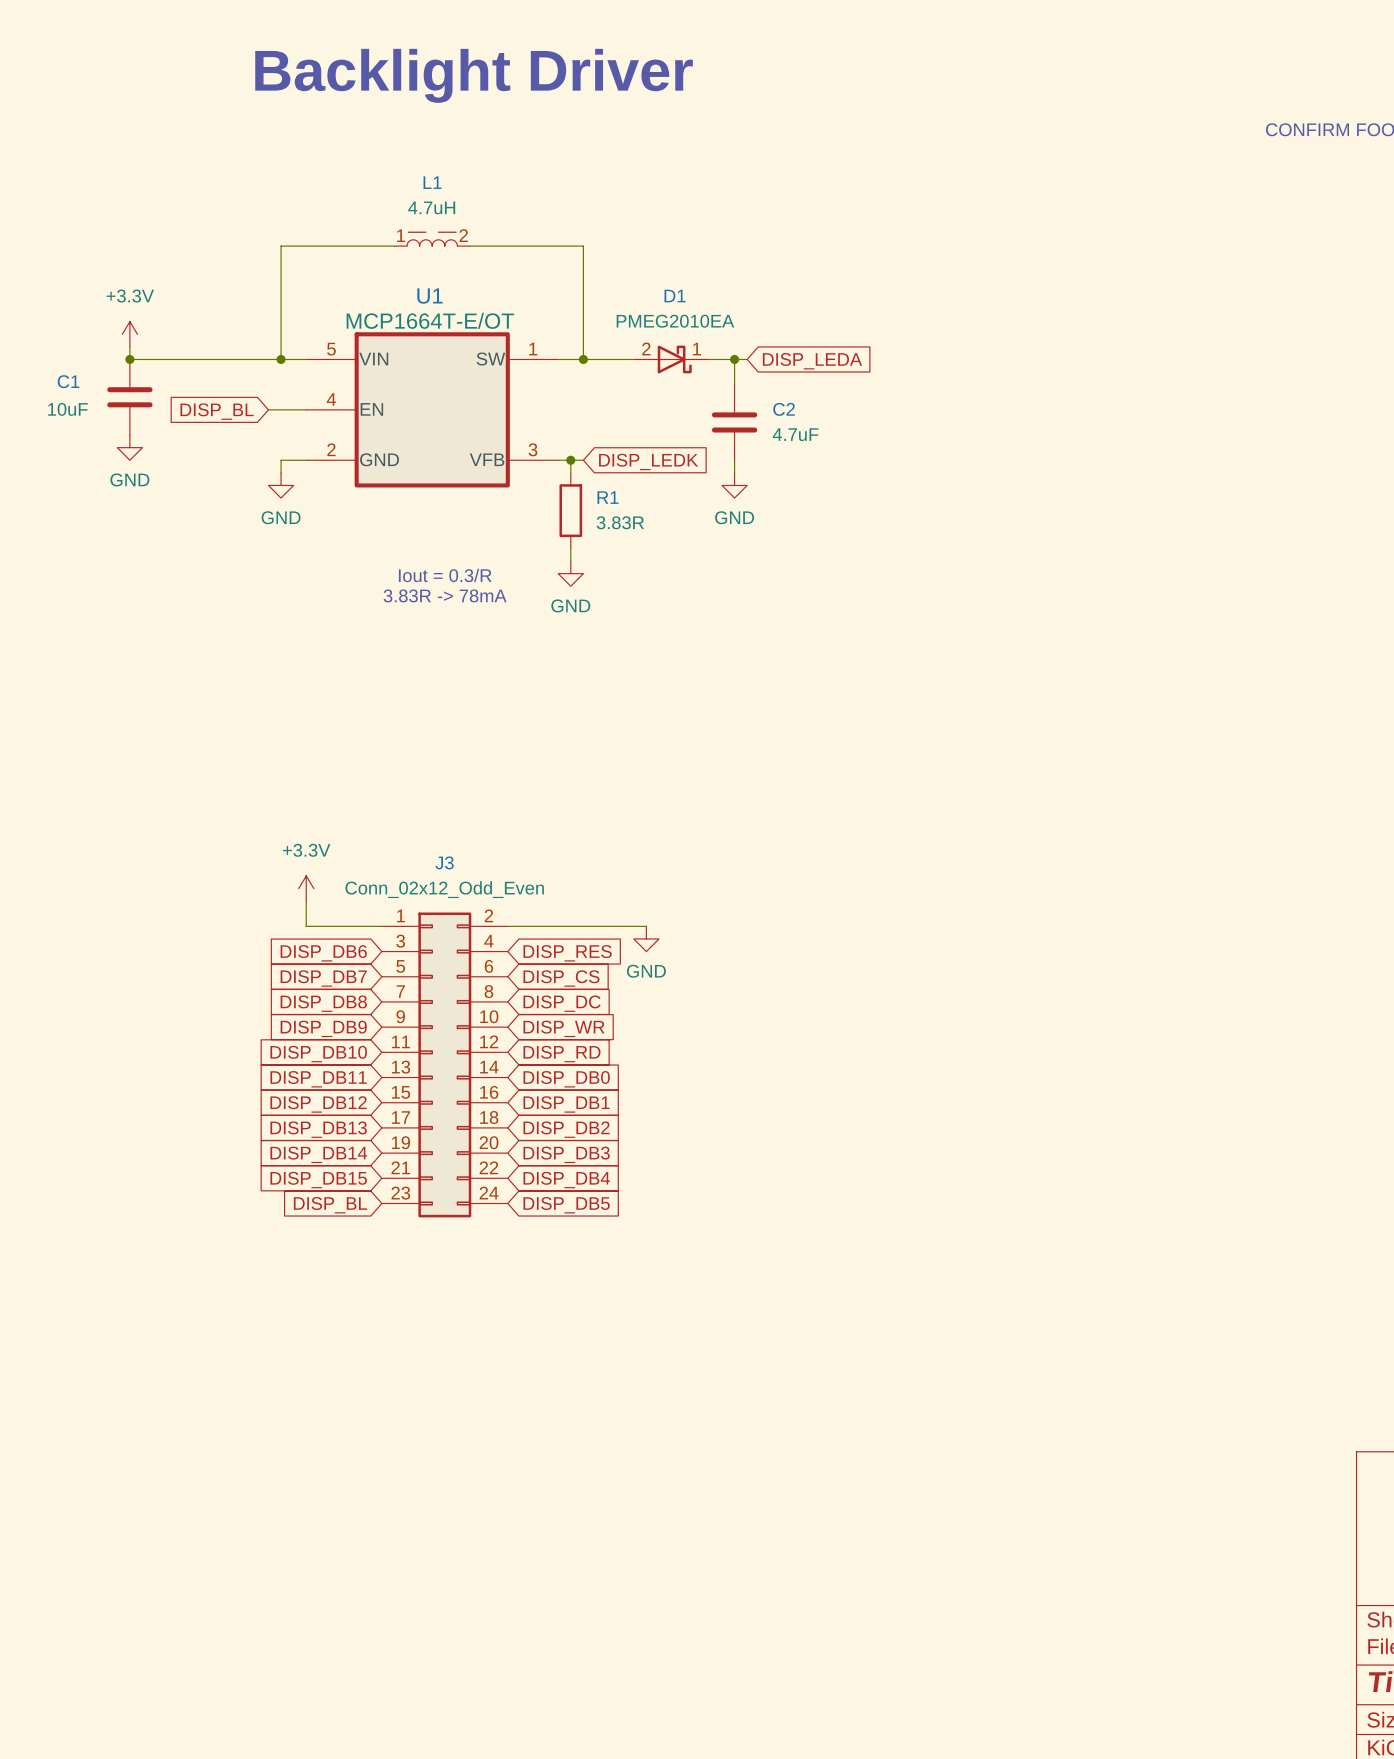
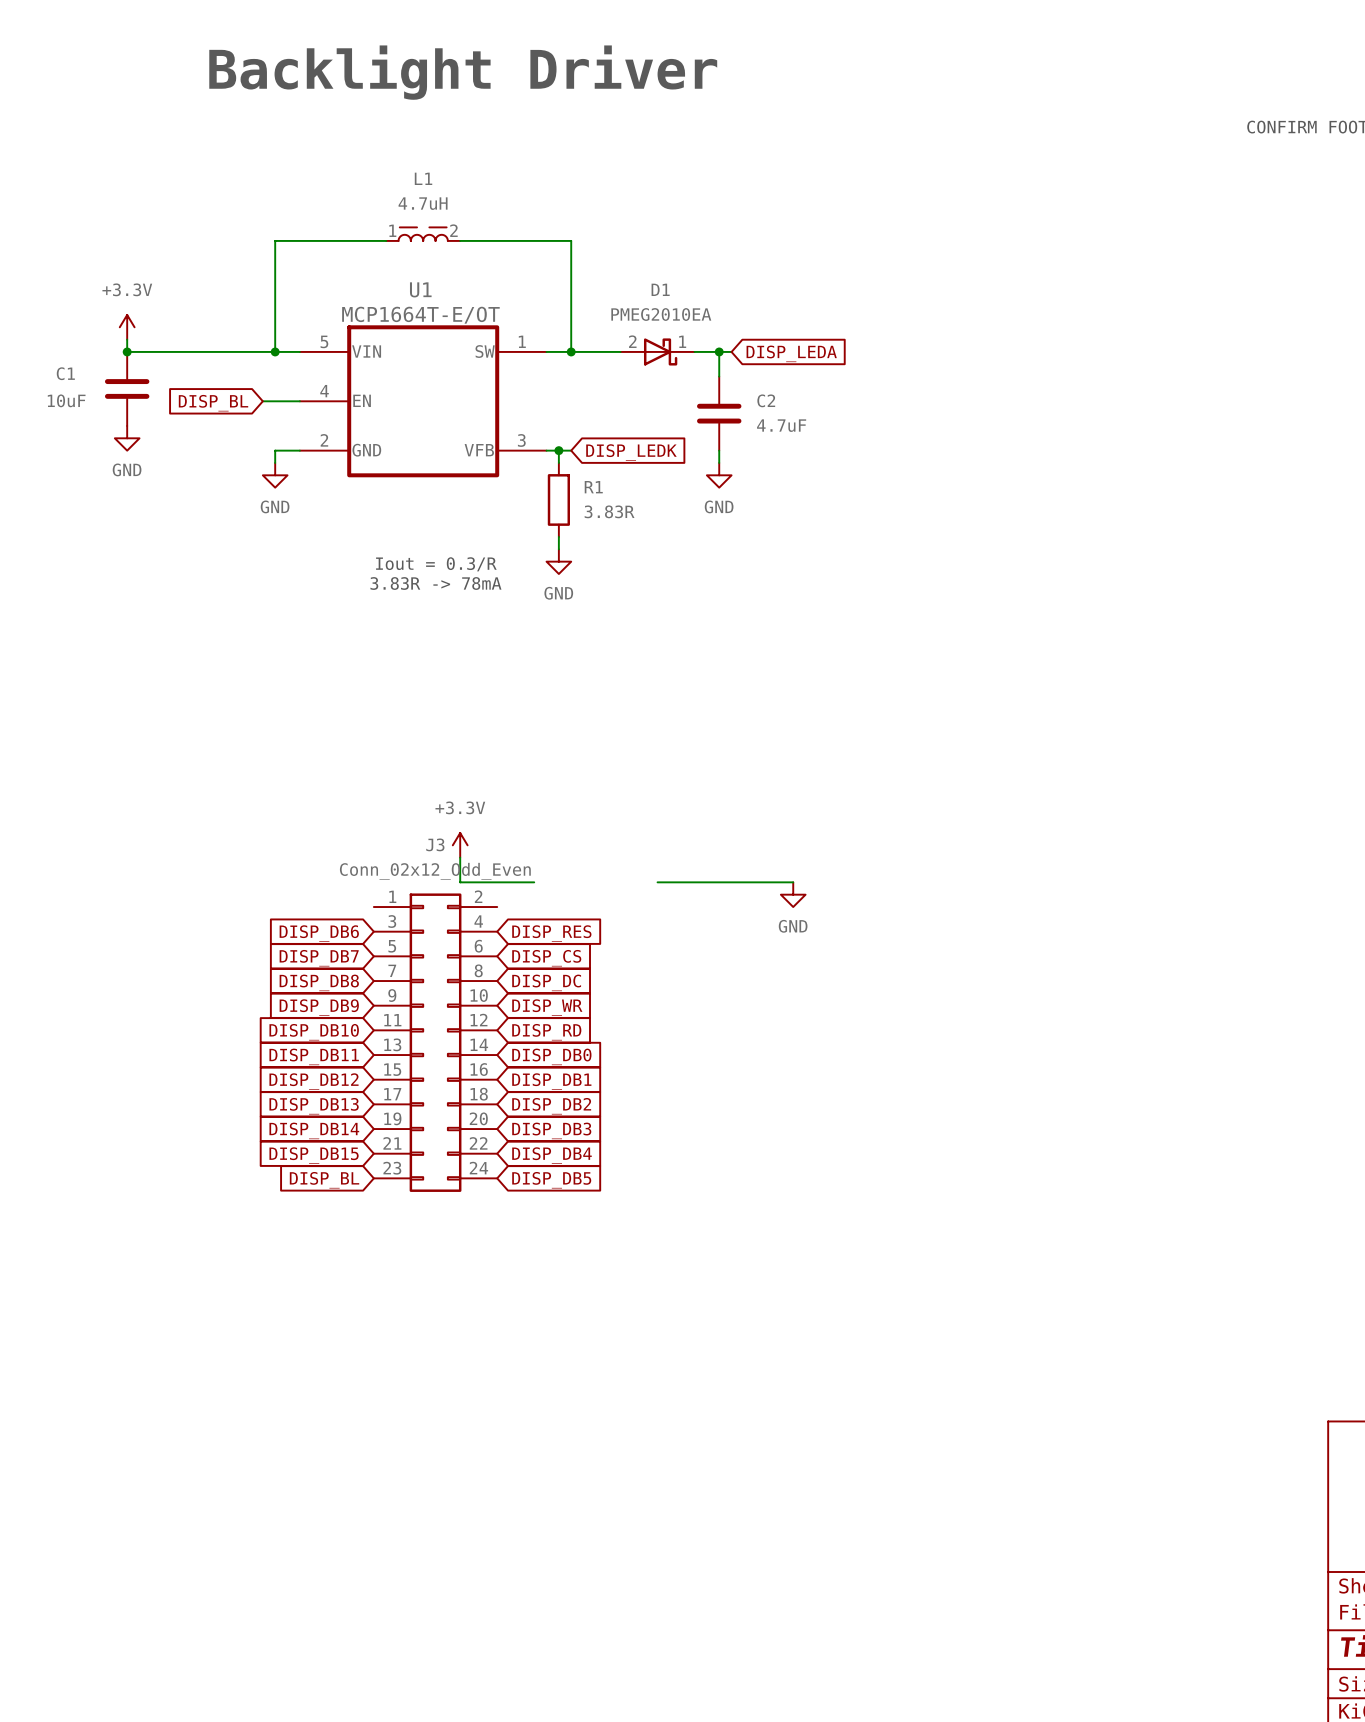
power symbol position: +3.3V (306, 888) -> +3.3V (460, 845)
wire: (306, 901) (306, 926) (381, 926) -> (460, 857) (460, 882) (534, 882)
wire: (507, 926) (646, 926) -> (657, 882) (793, 882)
power symbol position: GND (646, 938) -> GND (793, 894)

